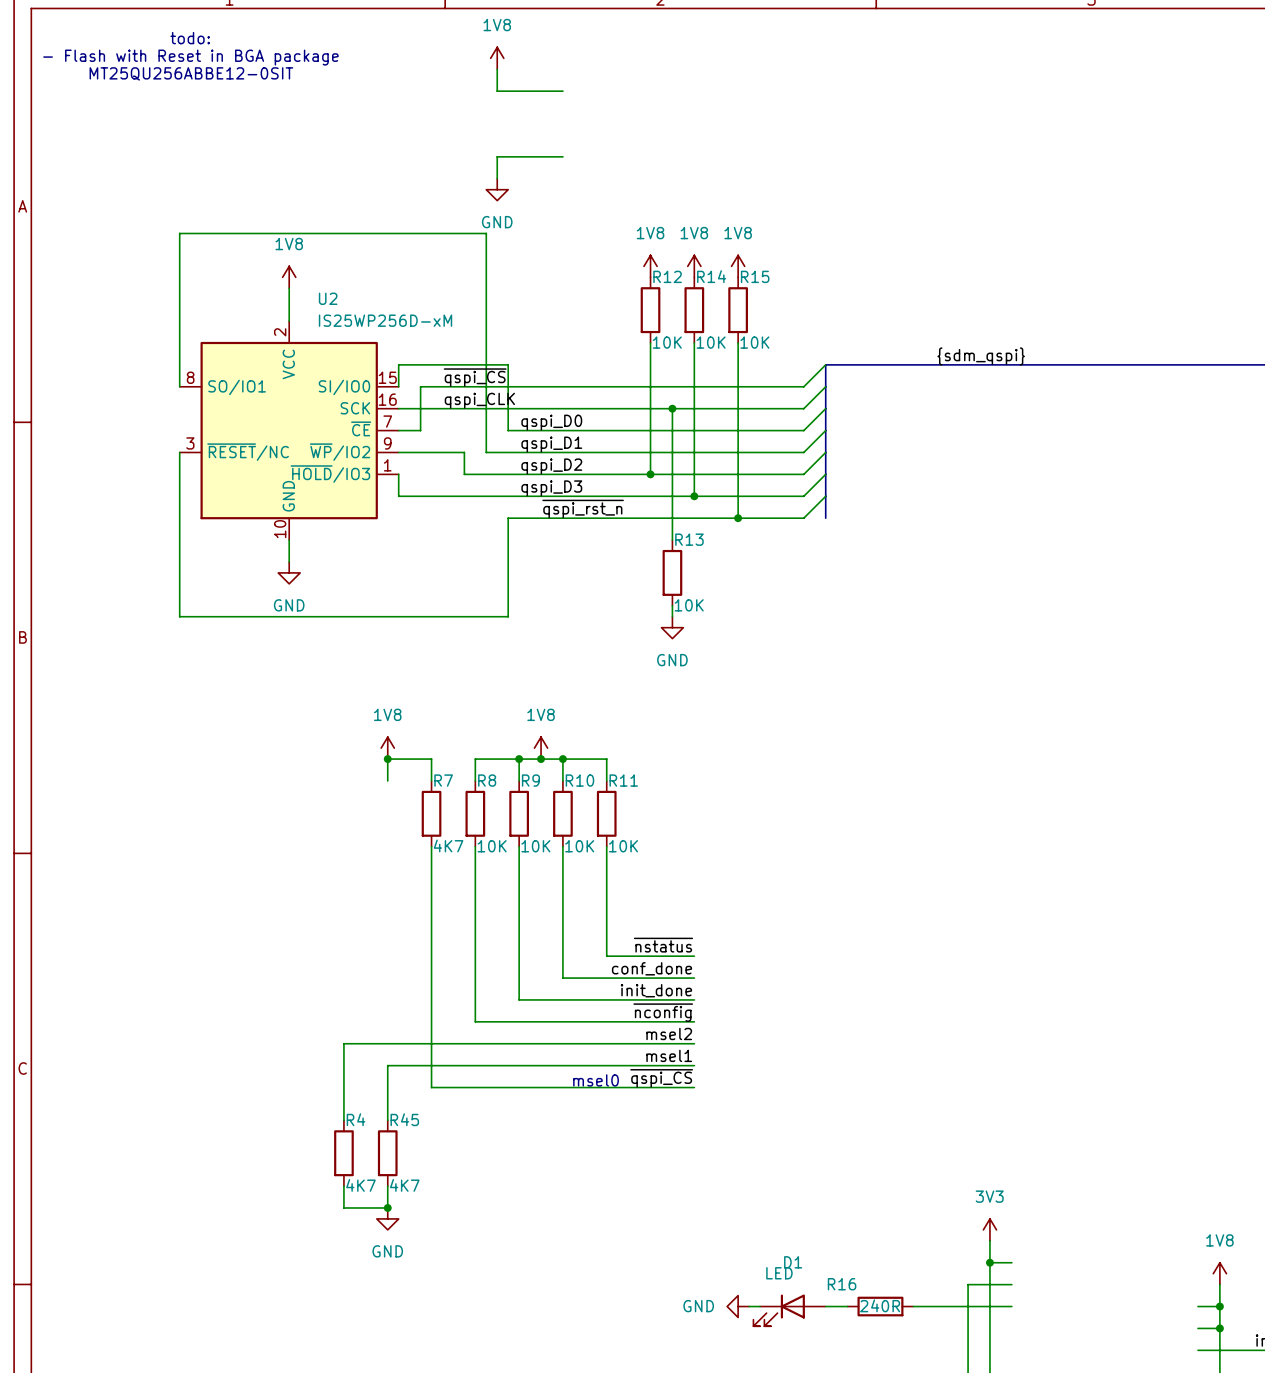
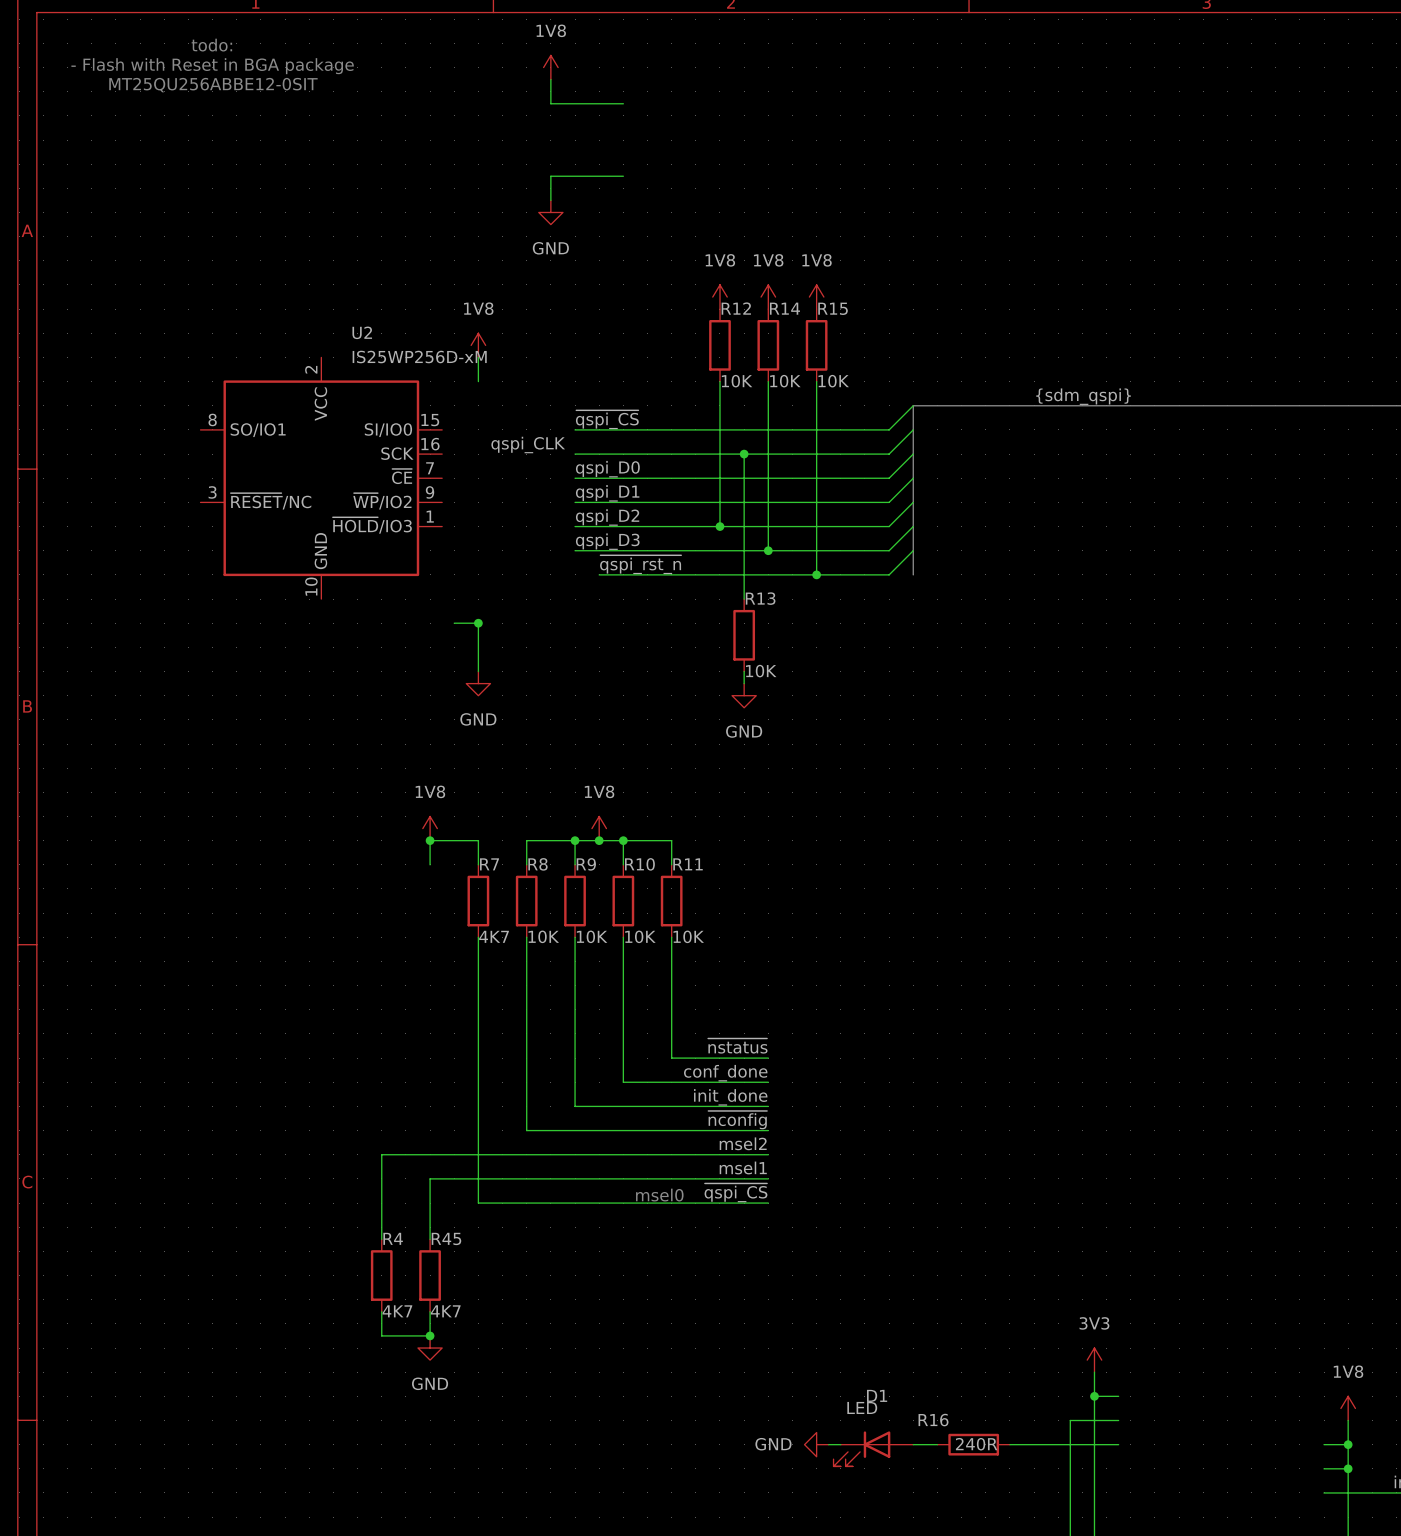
power symbol position: 1V8 (289, 277) -> 1V8 (478, 345)
wire: (289, 288) (289, 321) -> none
wire: none -> (478, 357) (478, 381)
label position: ~{qspi_CS} (475, 377) -> ~{qspi_CS} (607, 419)
wire: (179, 386) (179, 233) (486, 233) (486, 452) (519, 452) -> none
wire: (398, 386) (398, 364) (508, 364) (508, 430) (519, 430) -> none
wire: (519, 386) (420, 386) (420, 430) (398, 430) -> none
wire: (398, 408) (519, 408) -> none
wire: (179, 452) (179, 616) (508, 616) (508, 518) (541, 518) -> none
wire: (398, 452) (464, 452) (464, 474) (519, 474) -> none
wire: (398, 474) (398, 496) (519, 496) -> none
wire: (289, 540) (289, 561) -> none
wire: none -> (454, 623) (478, 623) (478, 671)
junction: none -> (478, 623)
power symbol position: GND (289, 572) -> GND (478, 683)

